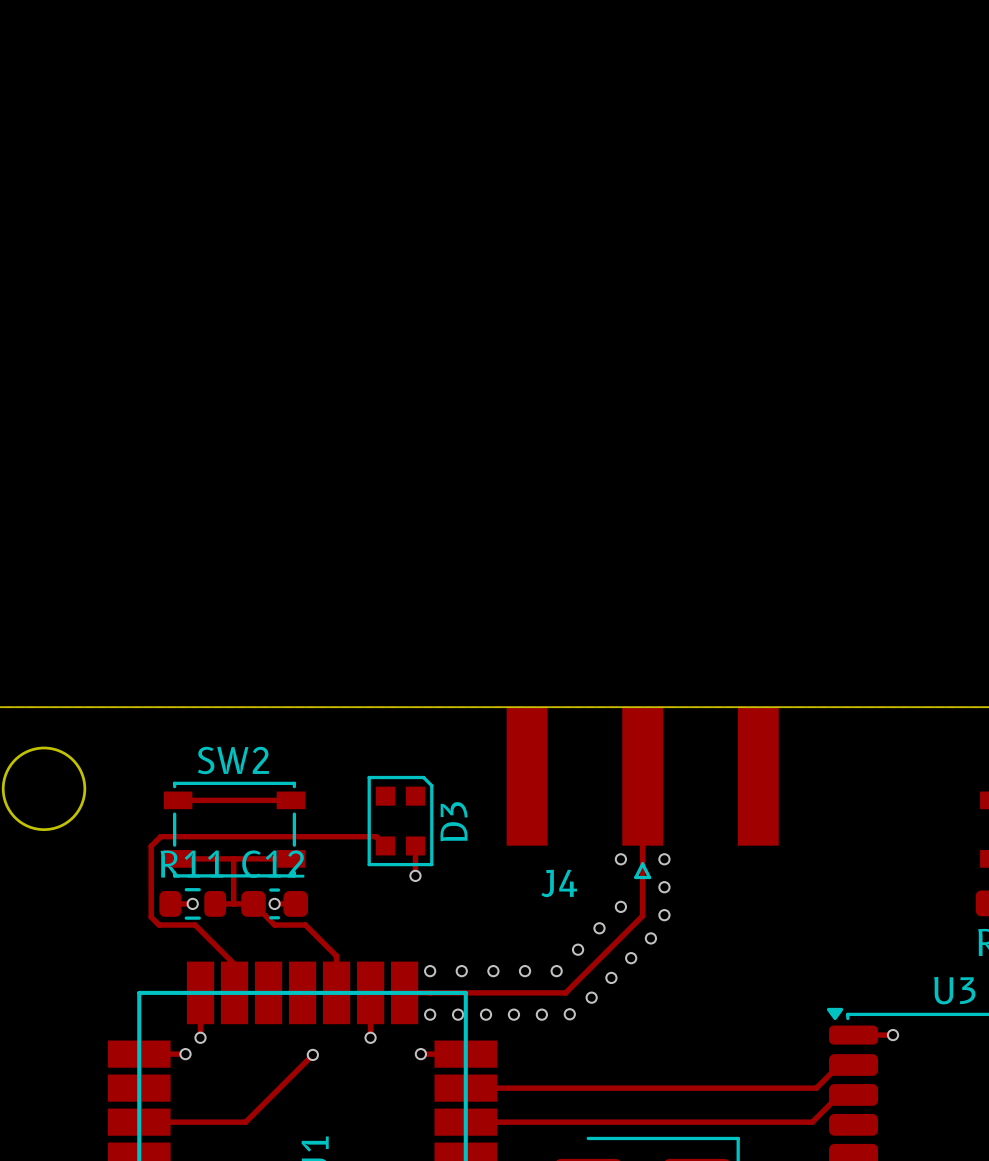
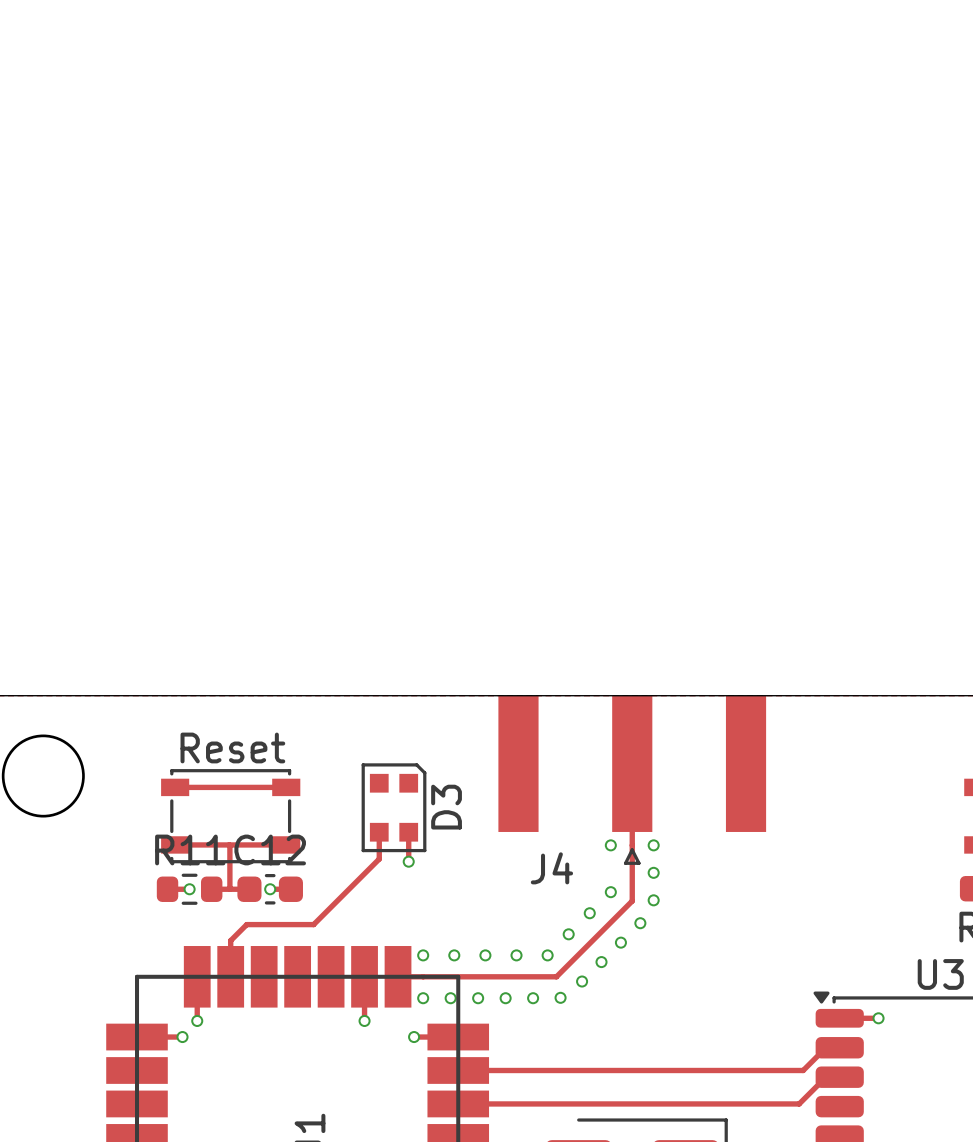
SW2 name: SW2 (233, 760) -> Reset (232, 747)
track: (385, 845) (376, 836) (160, 836) (151, 846) (151, 917) (159, 925) (195, 925) (234, 964) -> (379, 832) (379, 859) (313, 924) (246, 924) (230, 940) (230, 948)
track: (253, 903) (274, 925) (305, 925) (336, 956) (336, 992) -> none
track: (312, 1054) (245, 1122) (139, 1122) -> none
via: (312, 1054) -> none

